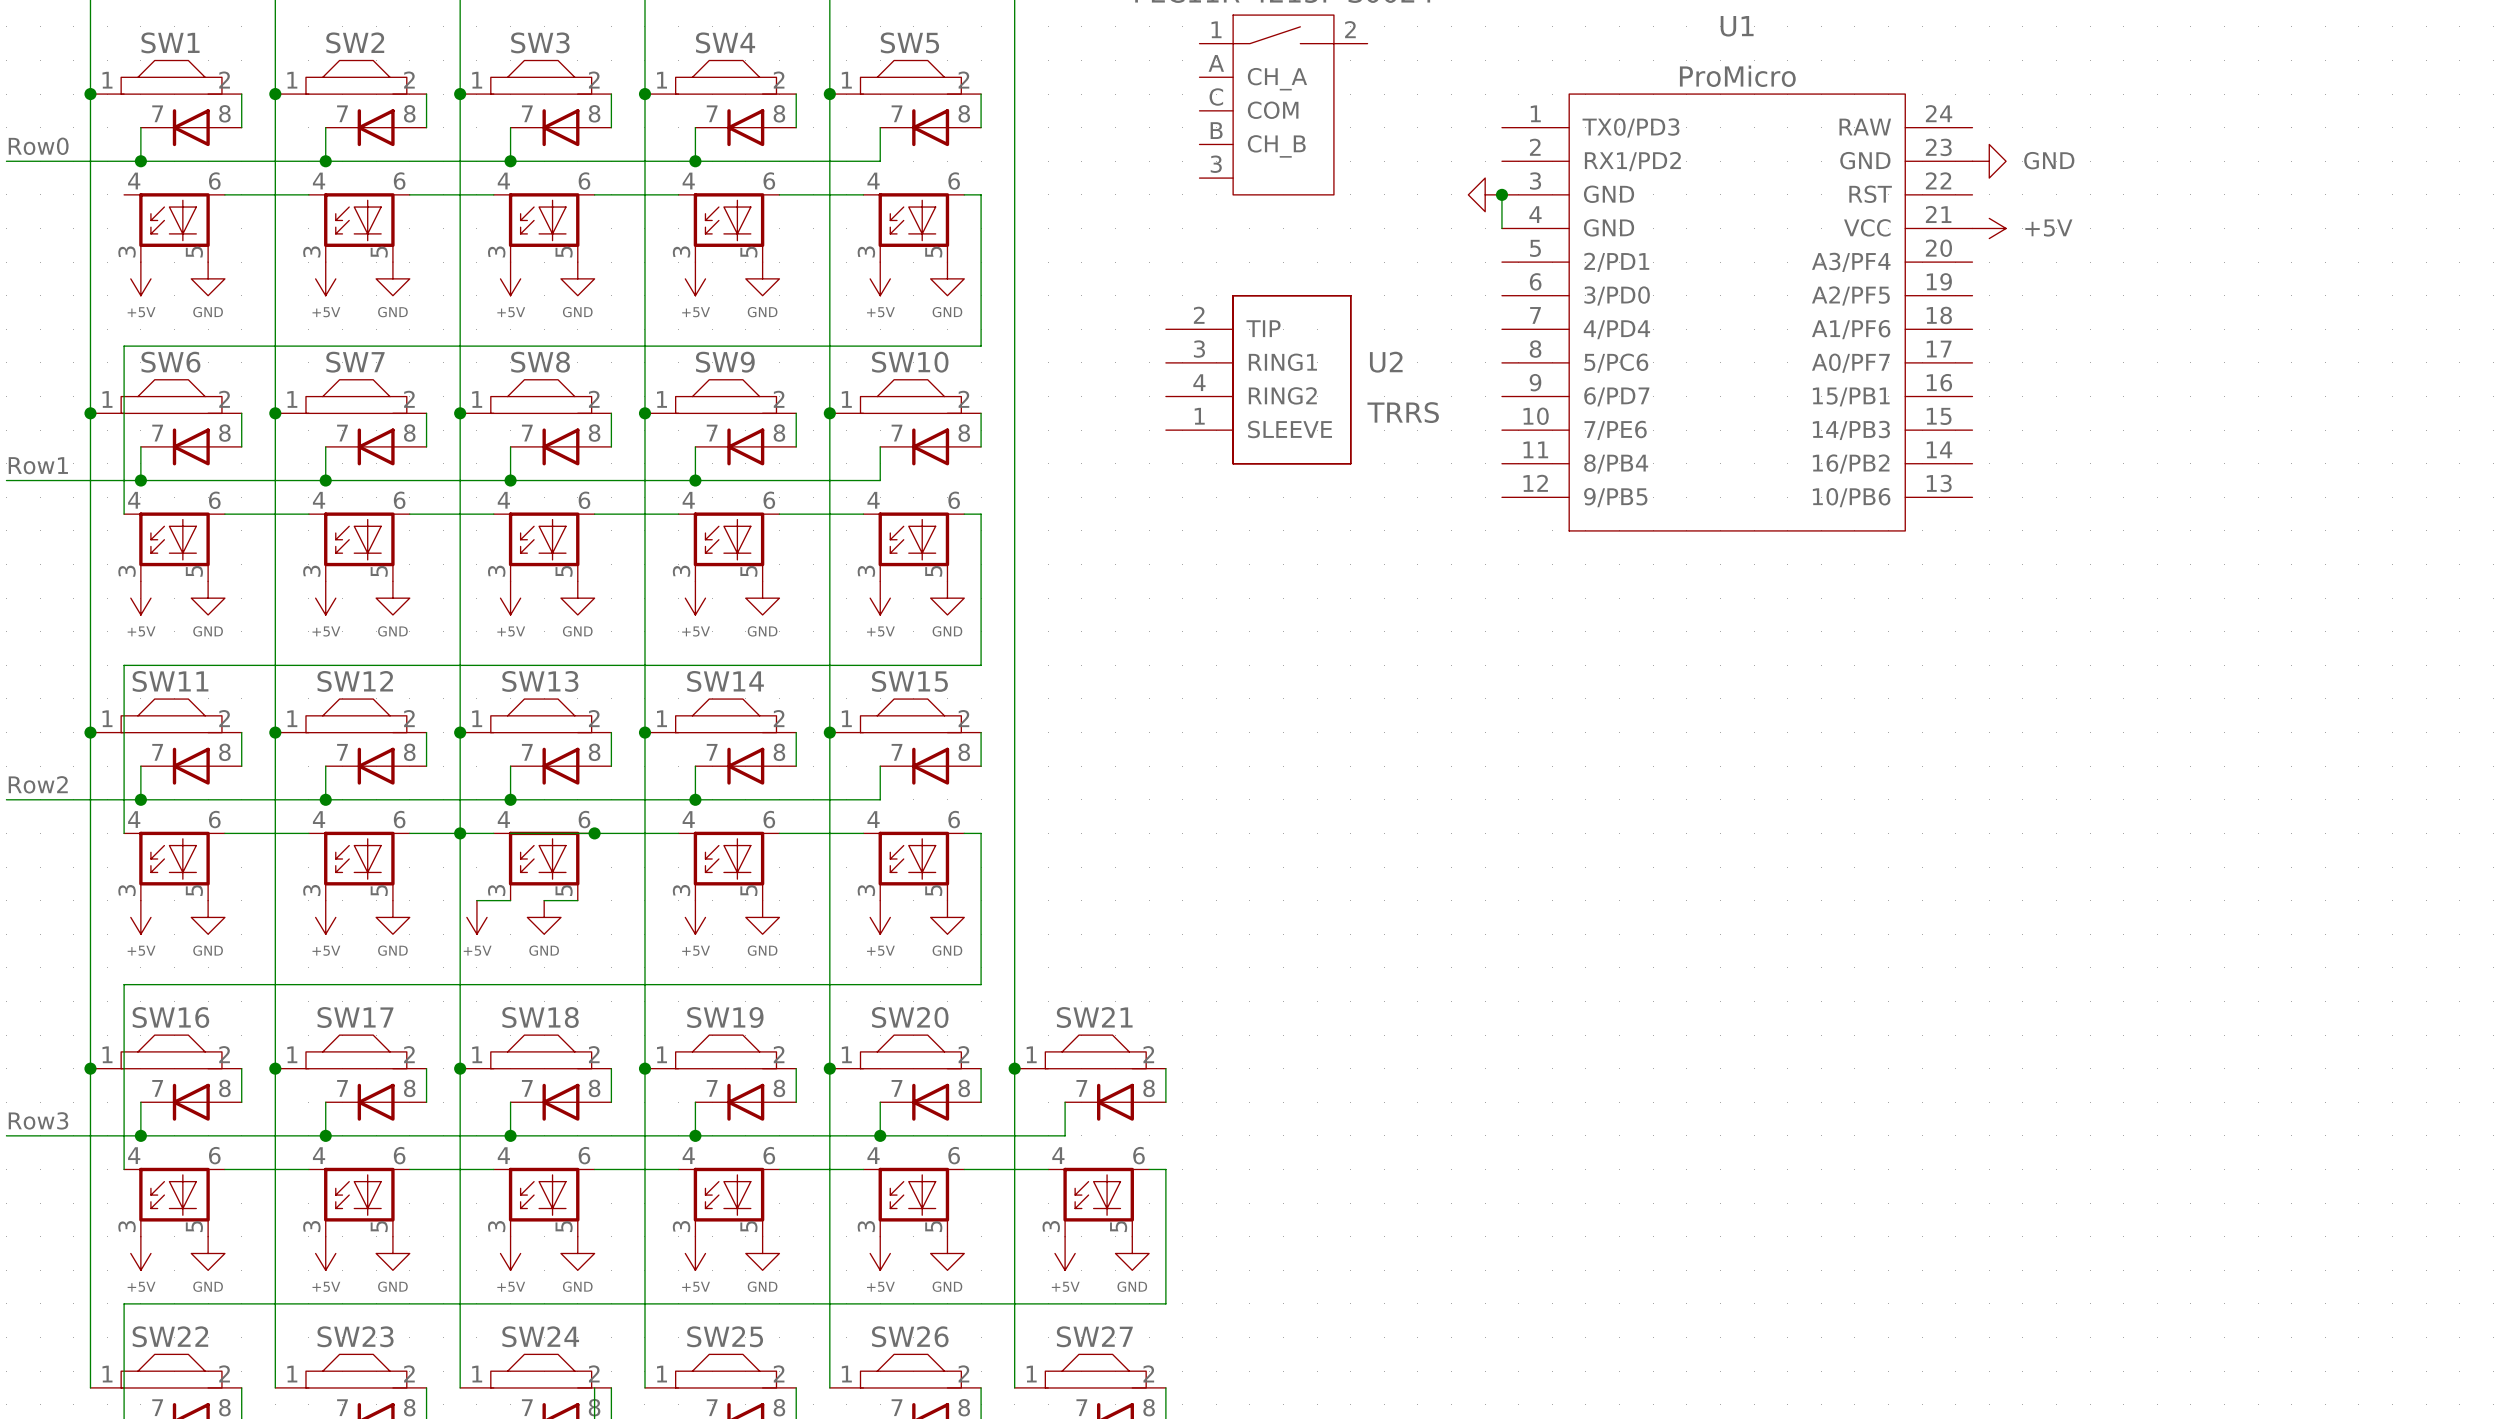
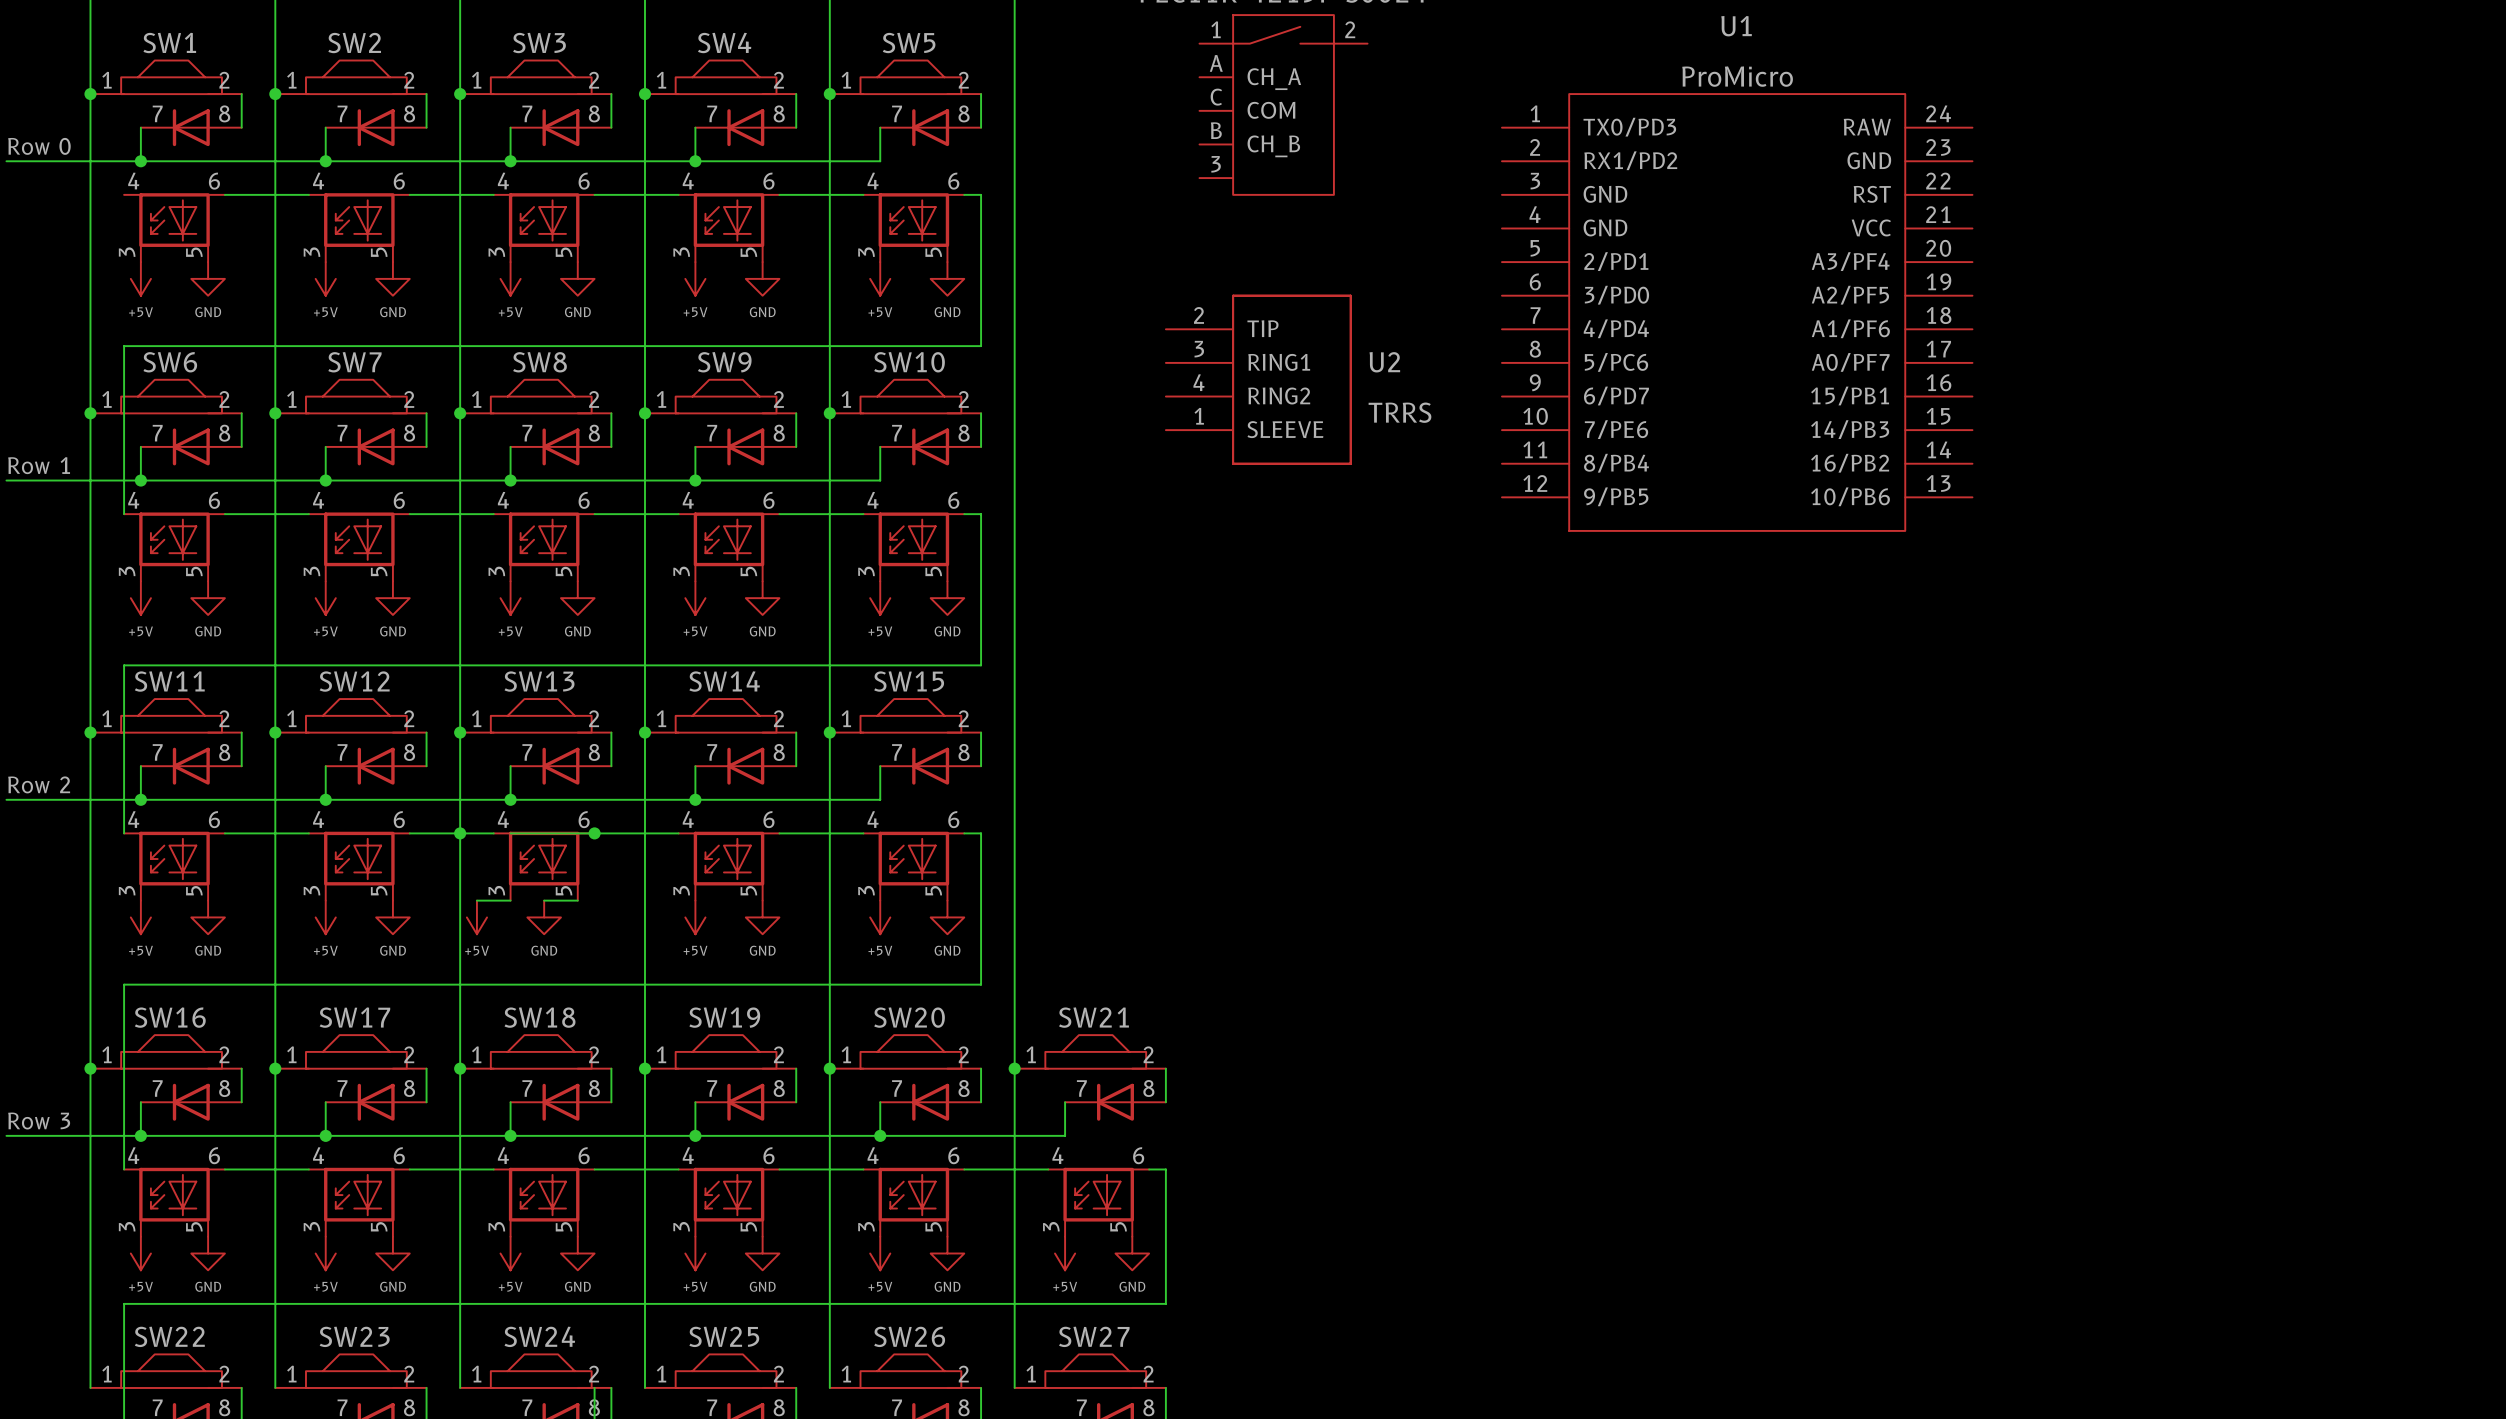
label: Row0 (38, 146) -> Row 0 (39, 146)
power symbol: GND (1989, 161) -> none
power symbol: (1485, 194) -> none
wire: (1501, 194) (1501, 228) -> none
junction: (1501, 194) -> none
power symbol: +5V (1989, 228) -> none
label: Row1 (38, 465) -> Row 1 (39, 465)
label: Row2 (38, 784) -> Row 2 (39, 784)
label: Row3 (38, 1120) -> Row 3 (39, 1121)

